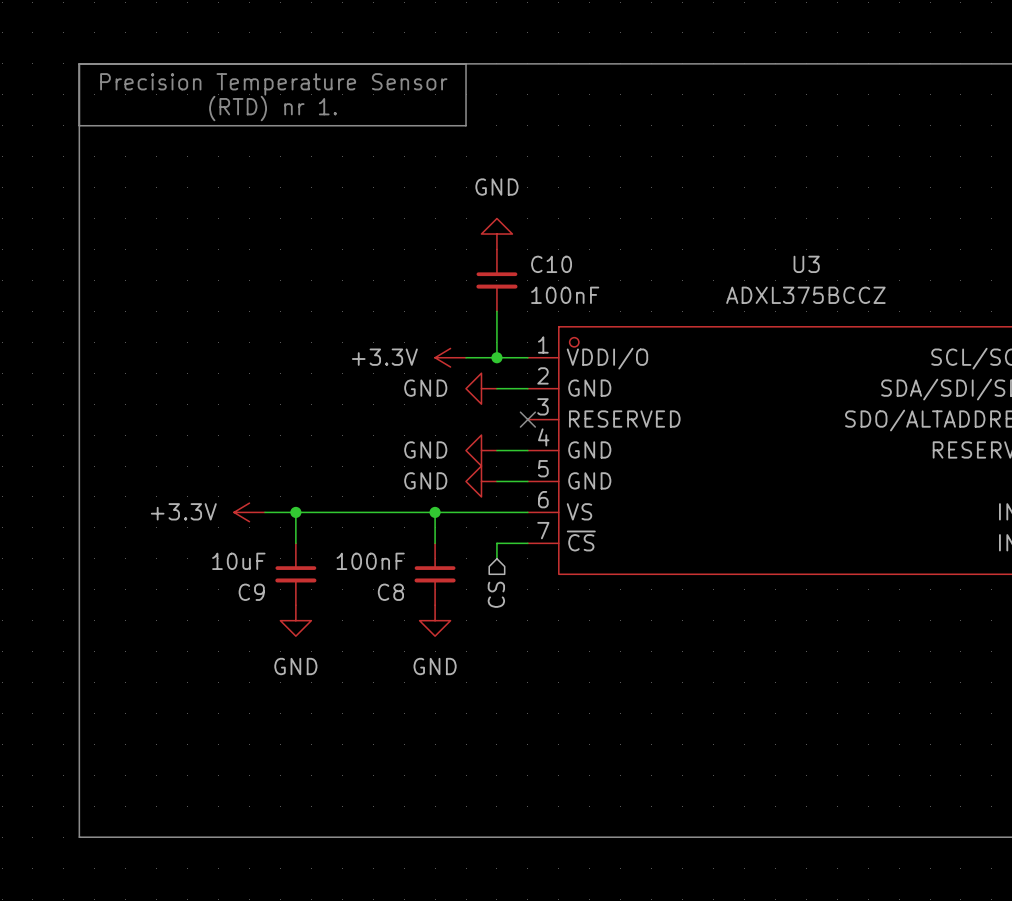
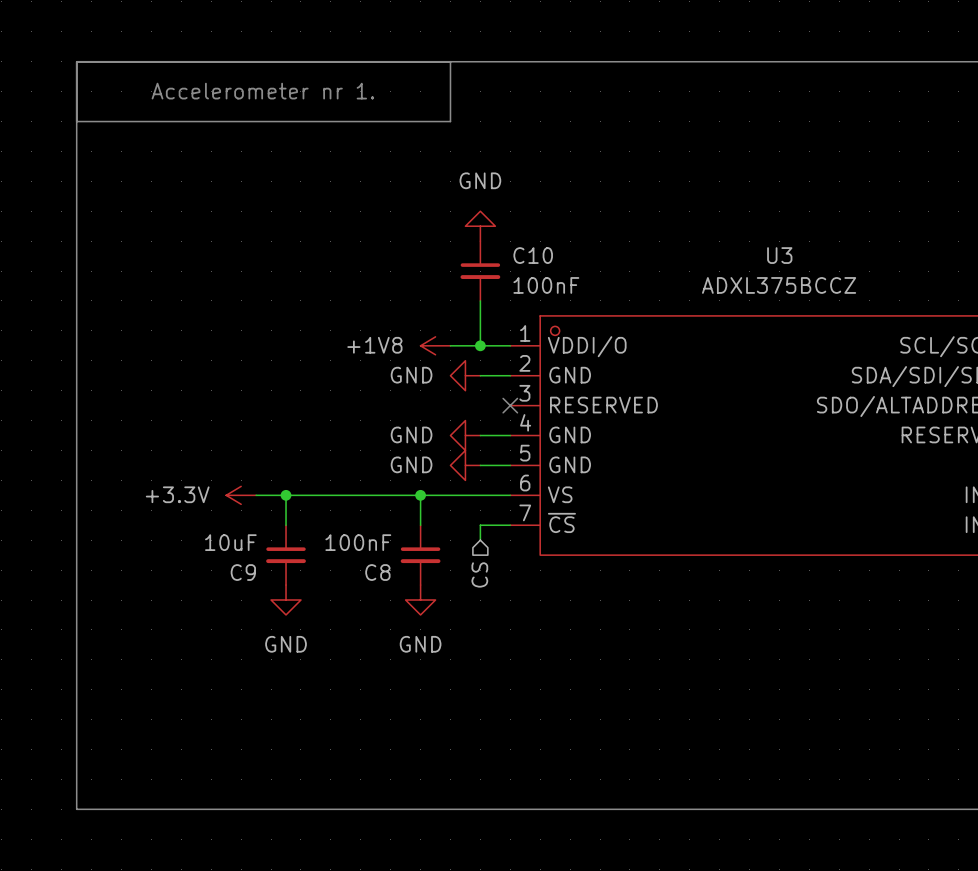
text: Precision Temperature Sensor (273, 84) -> none
text: none -> Accelerometer nr 1. (262, 91)
text: (RTD) nr 1. (273, 108) -> none
power symbol: +3.3V (450, 357) -> +1V8 (435, 345)

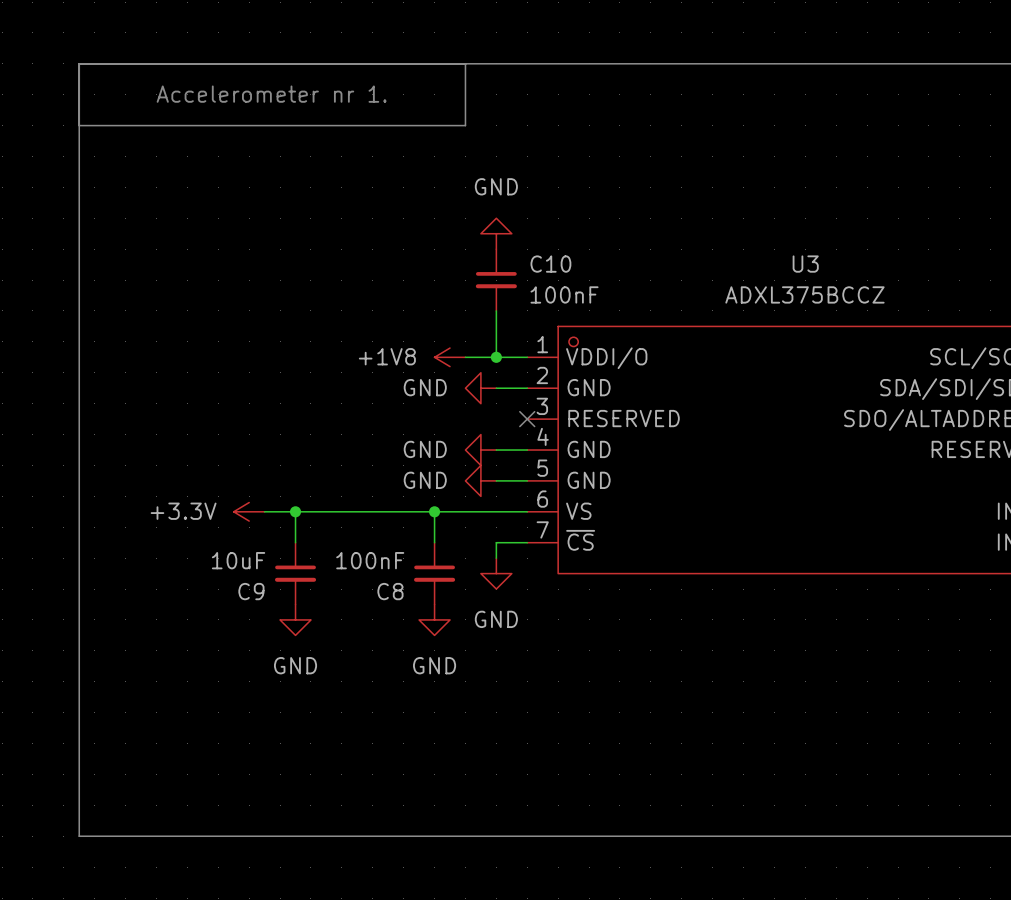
power symbol: none -> GND (496, 573)
hierarchical label: CS (479, 574) -> none

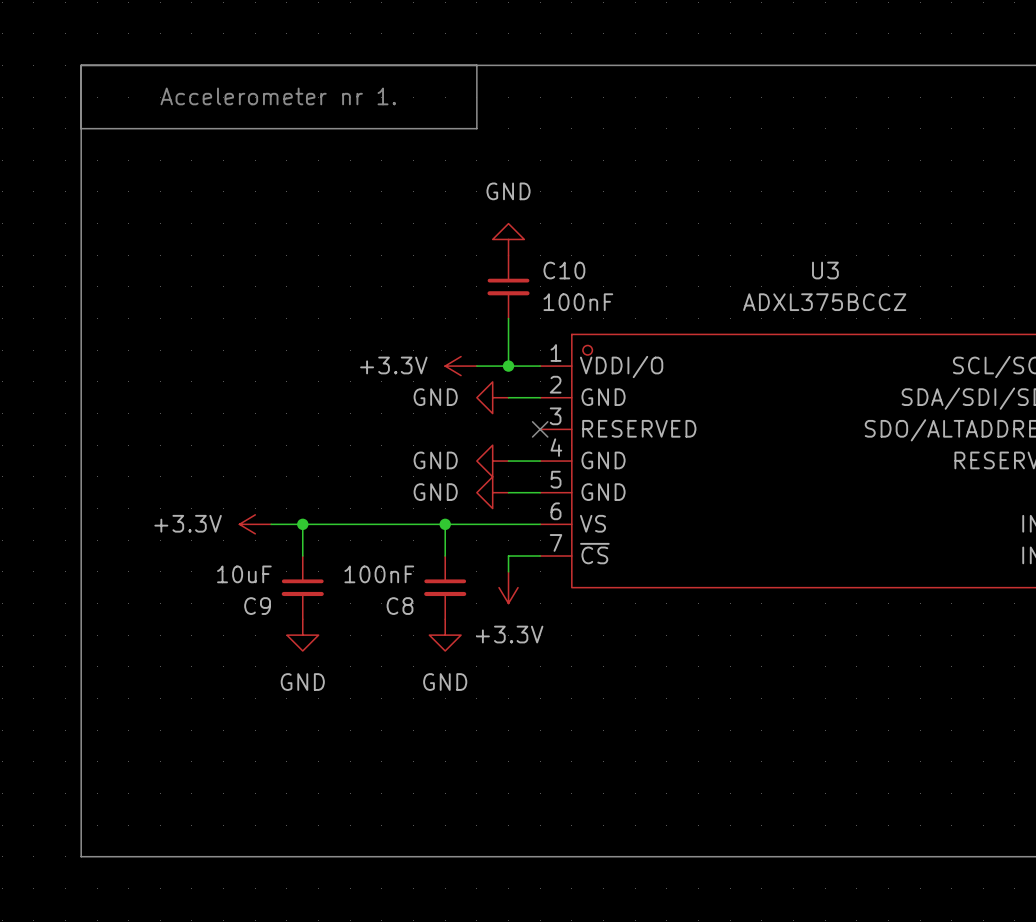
power symbol: +1V8 (450, 357) -> +3.3V (461, 366)
power symbol: GND (496, 573) -> +3.3V (508, 587)

